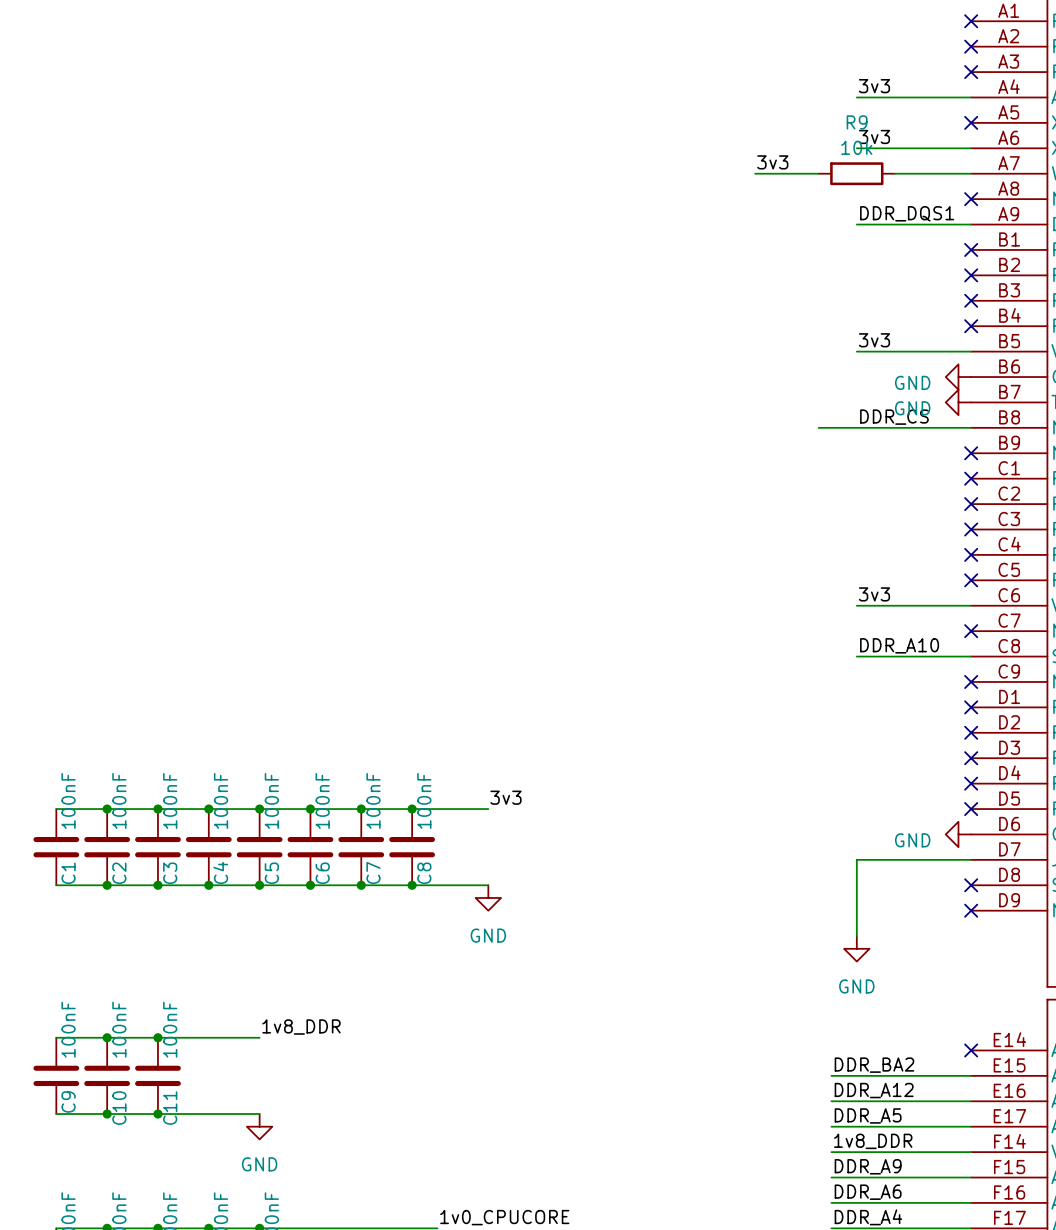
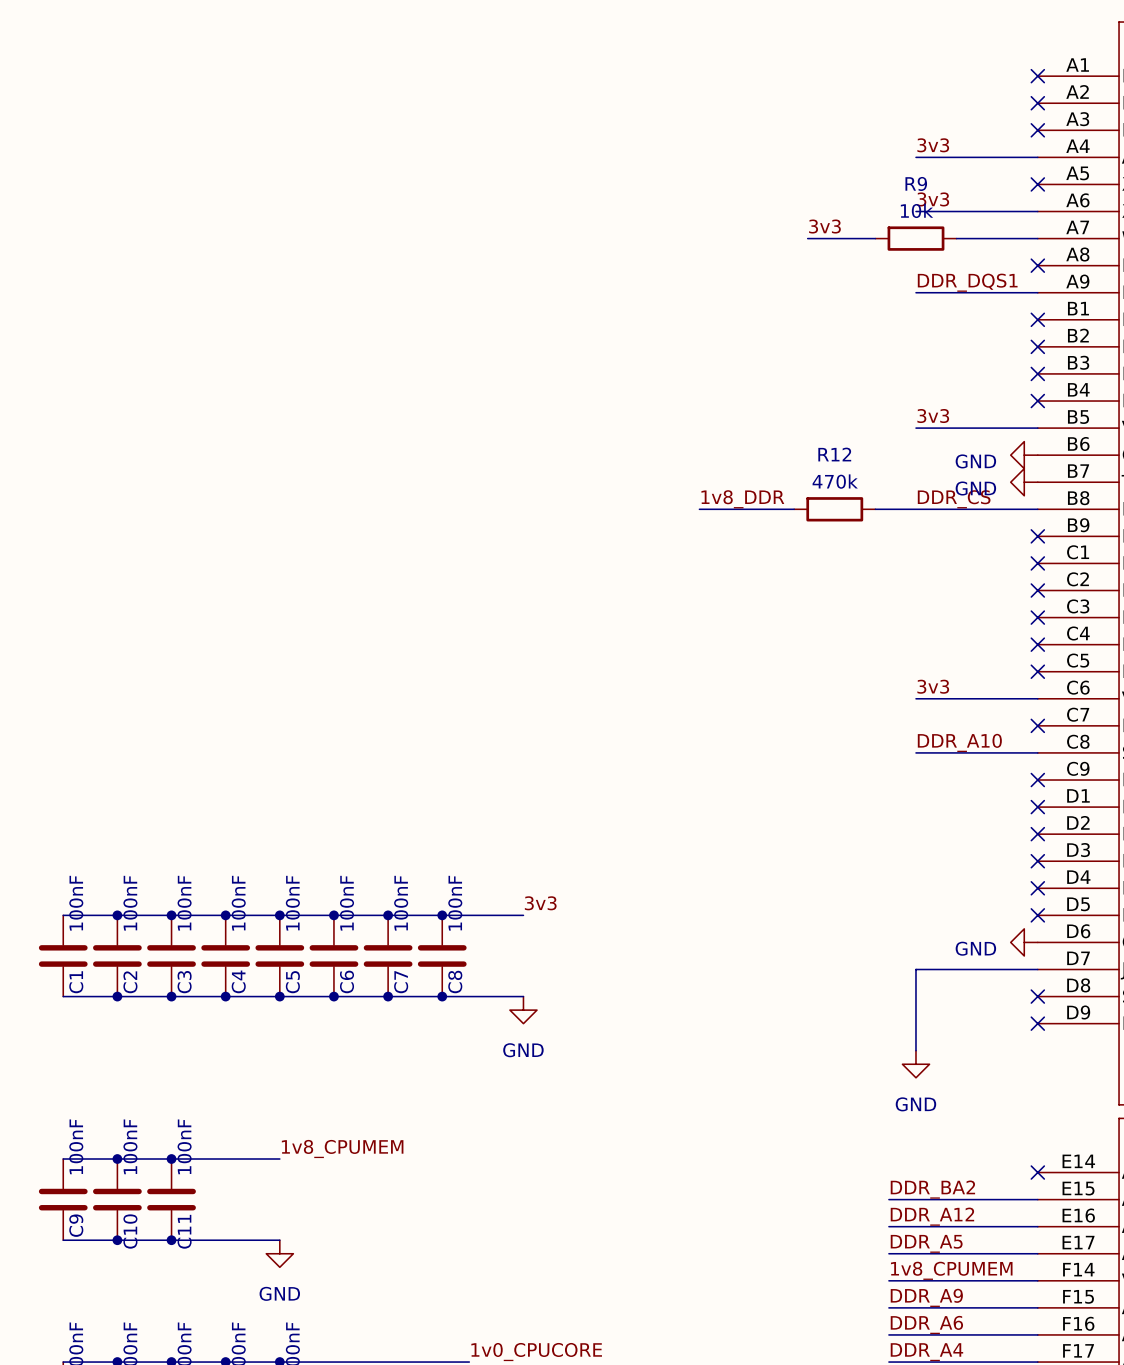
label: none -> 1v8_DDR (742, 499)
wire: none -> (699, 509) (794, 509)
R12: none -> 470k (834, 509)
label: 1v8_DDR (301, 1027) -> 1v8_CPUMEM (342, 1148)
label: 1v8_DDR (873, 1141) -> 1v8_CPUMEM (951, 1270)

